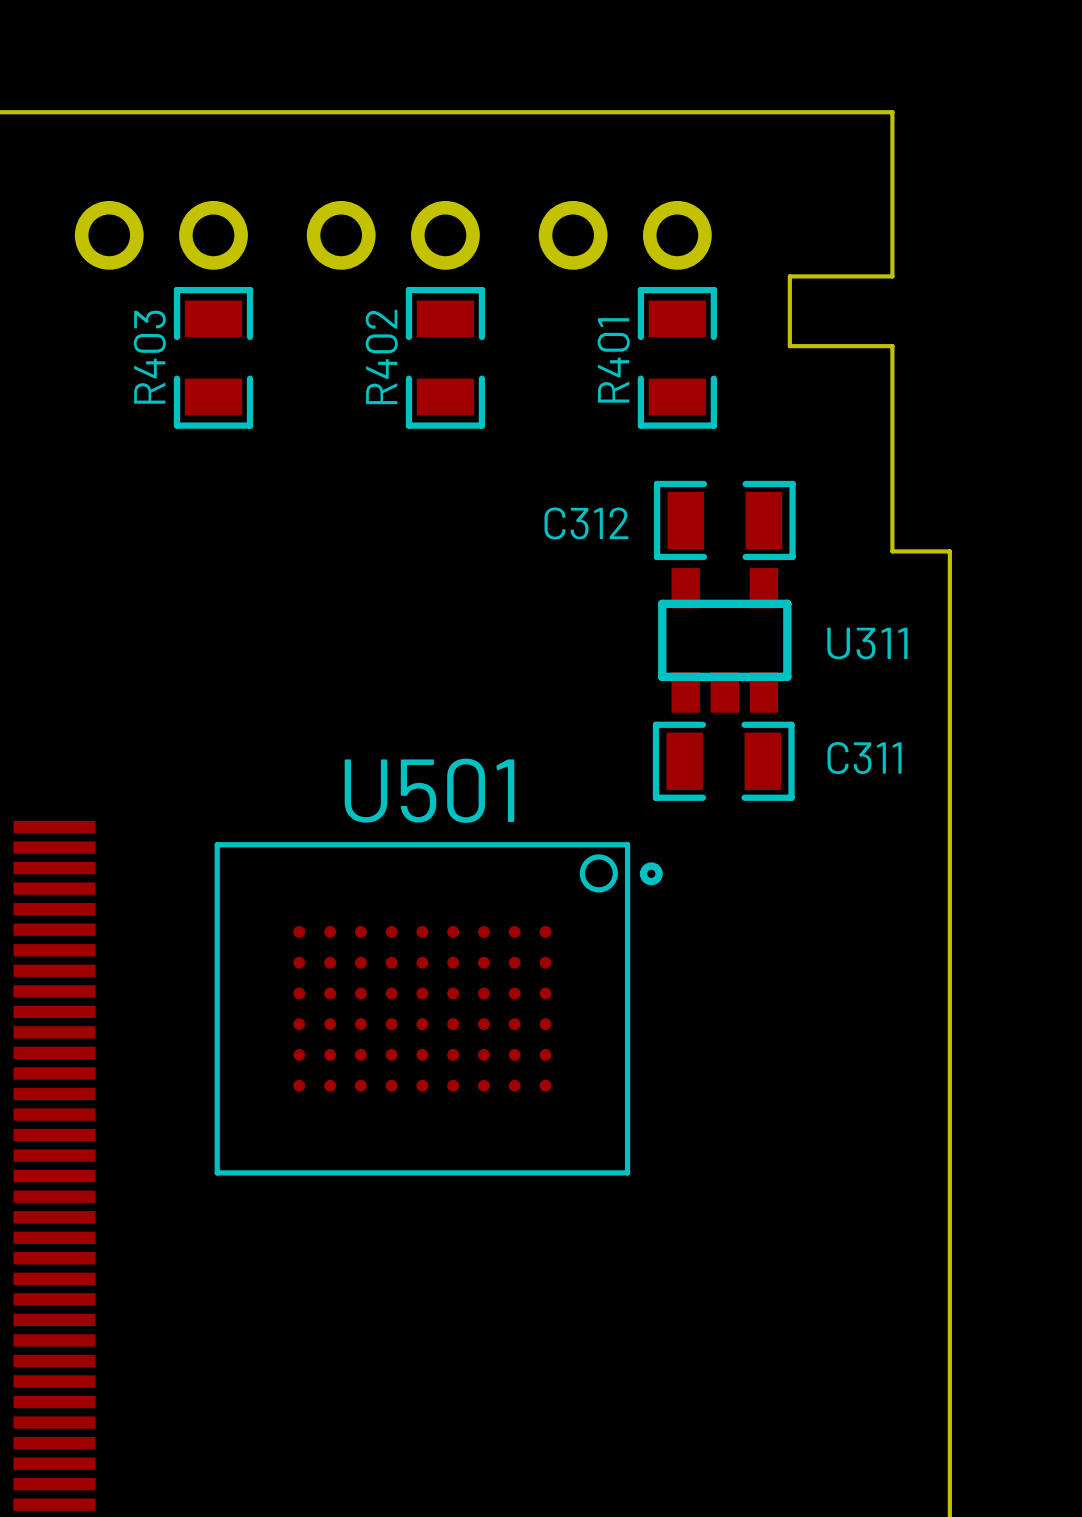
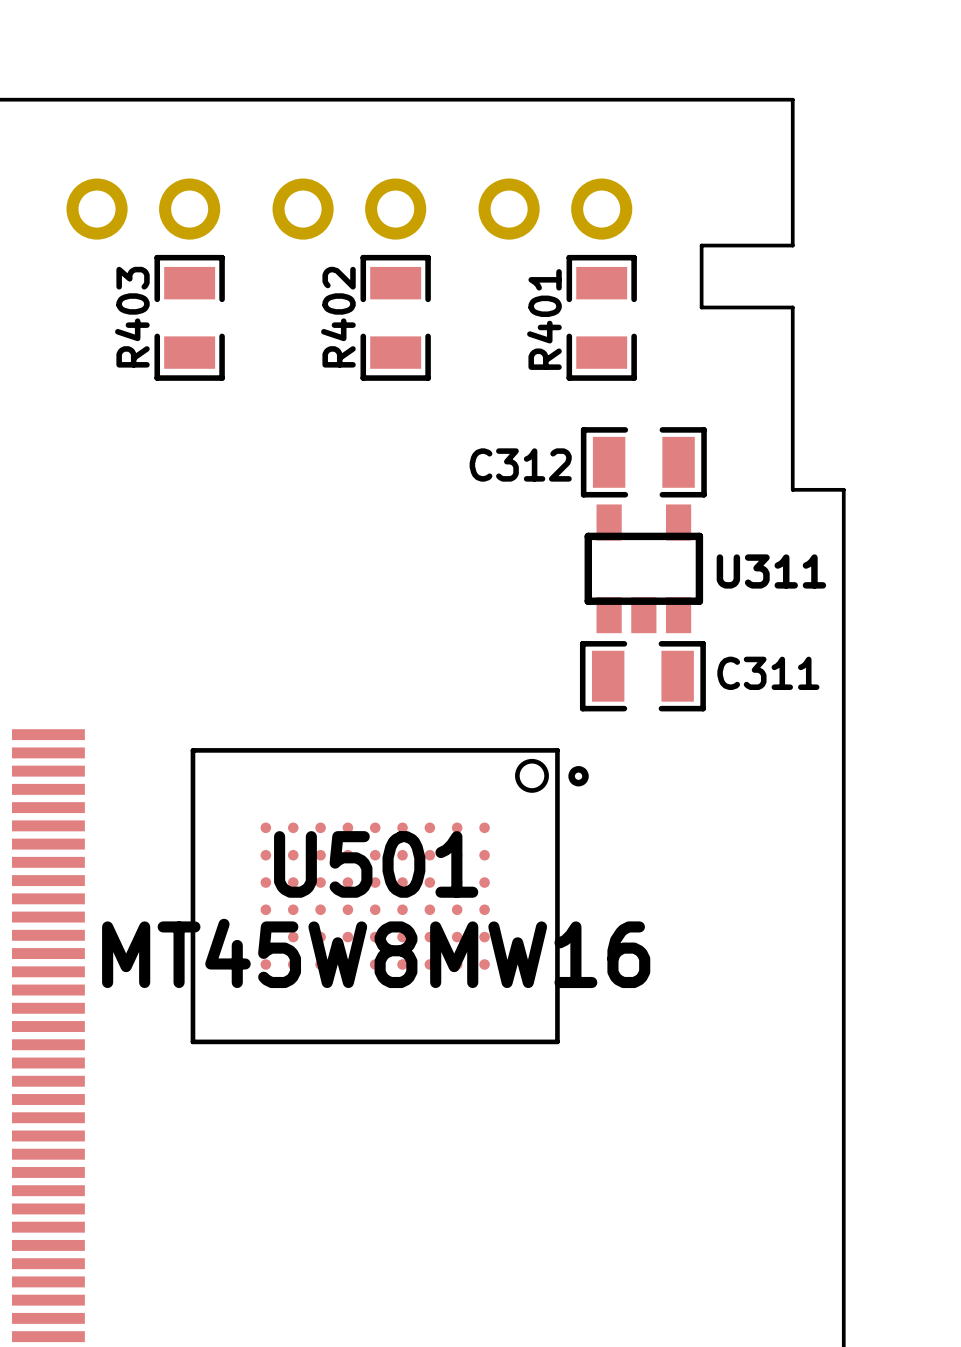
U501 name position: U501 (429, 790) -> U501 (376, 864)
U501 value: none -> MT45W8MW16 (376, 953)

